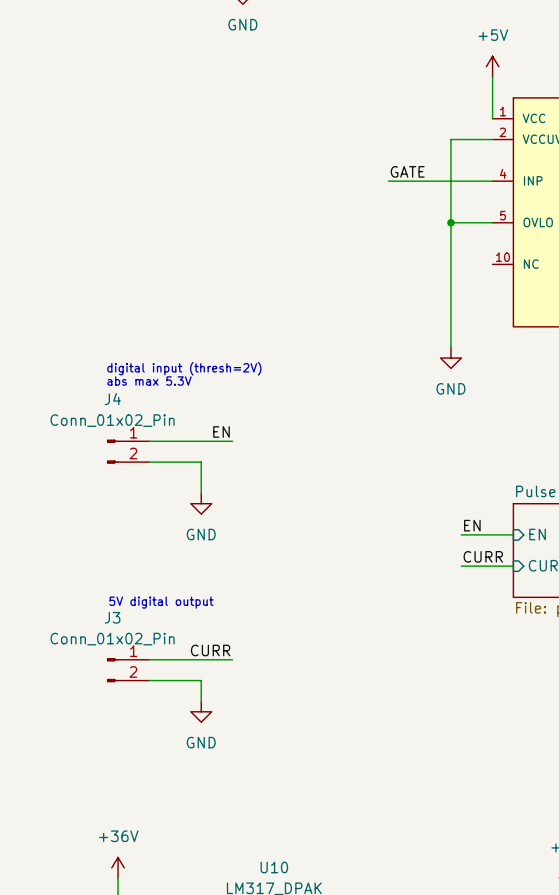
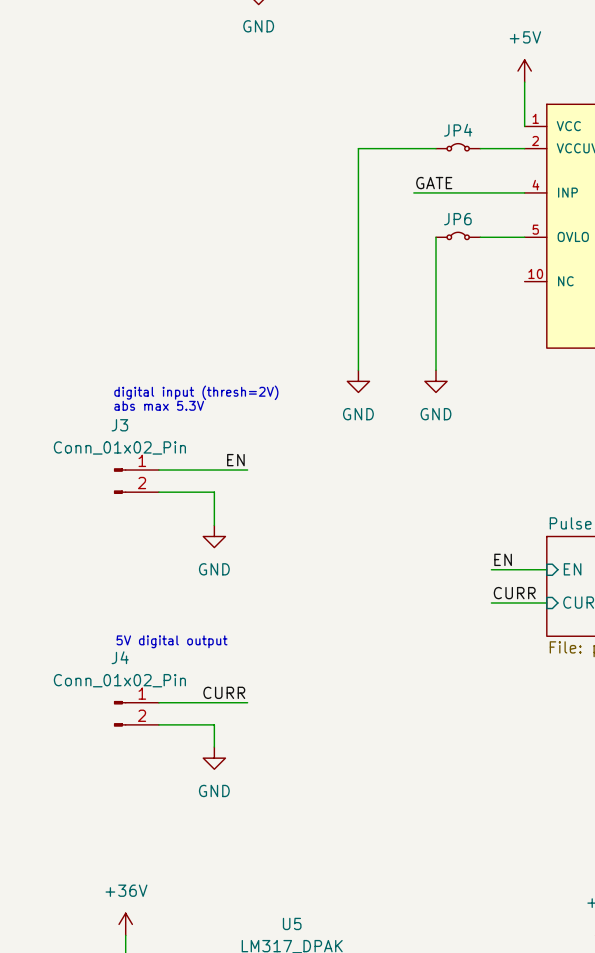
JP4: none -> (458, 147)
wire: none -> (436, 148) (358, 148) (358, 370)
wire: (450, 139) (450, 347) -> none
JP6: none -> (458, 235)
wire: none -> (436, 237) (436, 370)
junction: (450, 222) -> none
power symbol: none -> GND (358, 381)
power symbol position: GND (450, 358) -> GND (436, 381)
J4 name: J4 (112, 399) -> J3 (119, 425)
J3 name: J3 (112, 617) -> J4 (120, 657)
U10 name: U10 (274, 867) -> U5 (292, 923)

